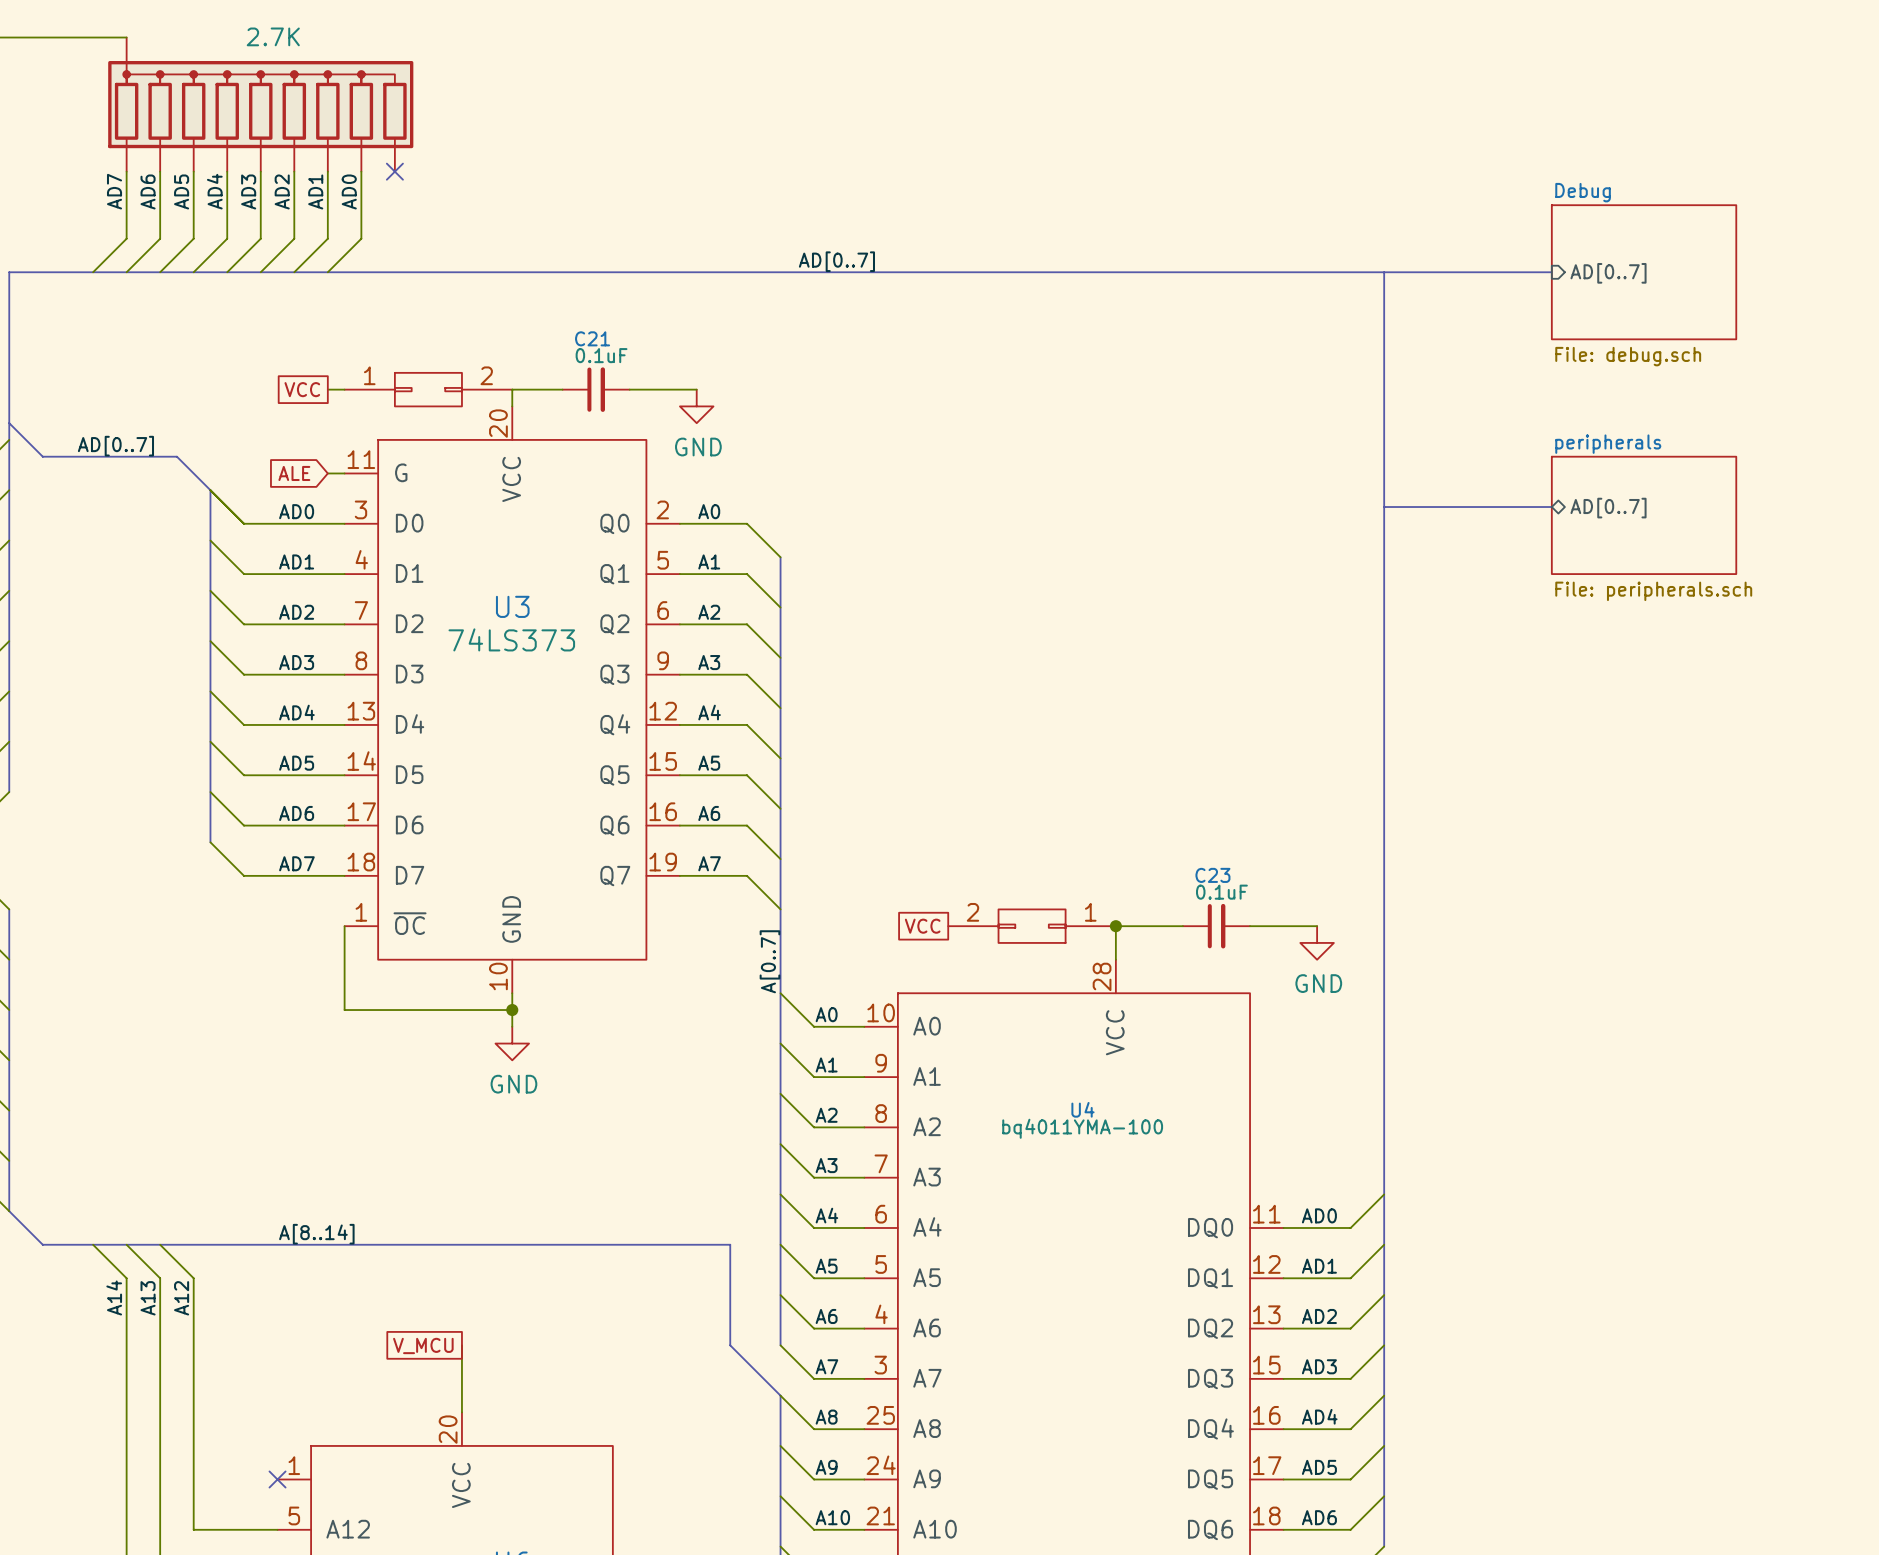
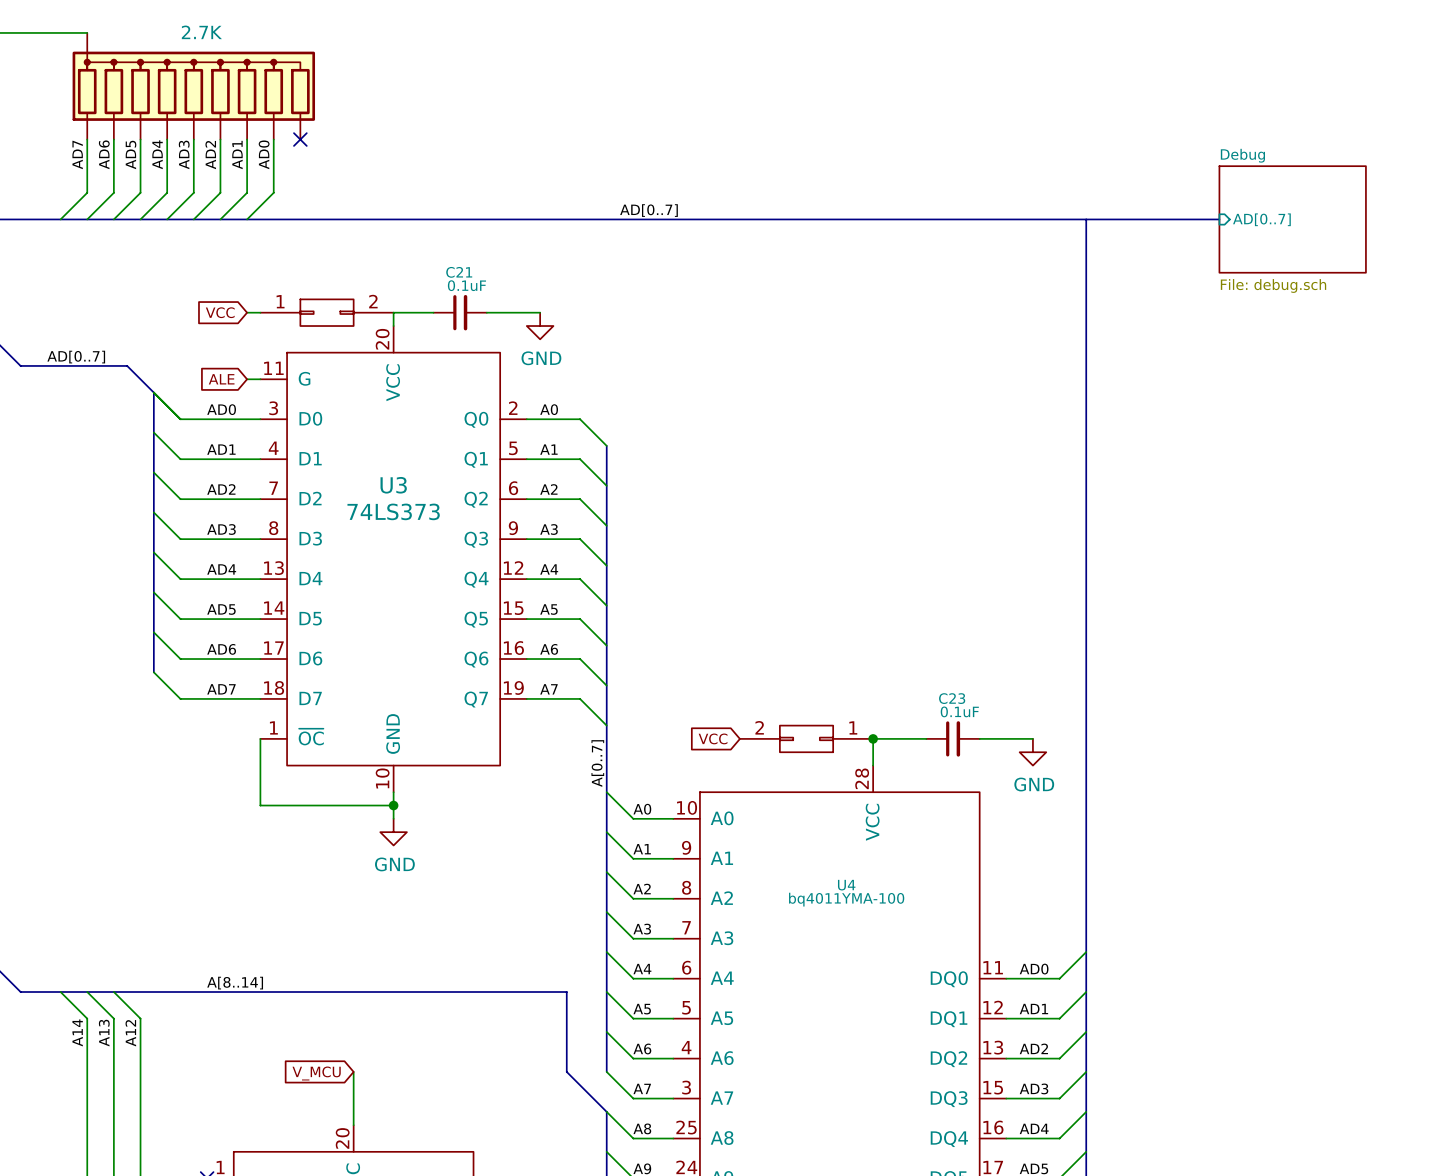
global label shape: passive (302, 389) -> input (220, 312)
bus: (1384, 507) (1551, 507) -> none
sheet pin: AD[0..7] (1608, 508) -> none
sheet peripherals: File: peripherals.sch (1644, 515) -> none
global label shape: passive (922, 926) -> input (713, 738)
global label shape: passive (423, 1345) -> input (316, 1073)

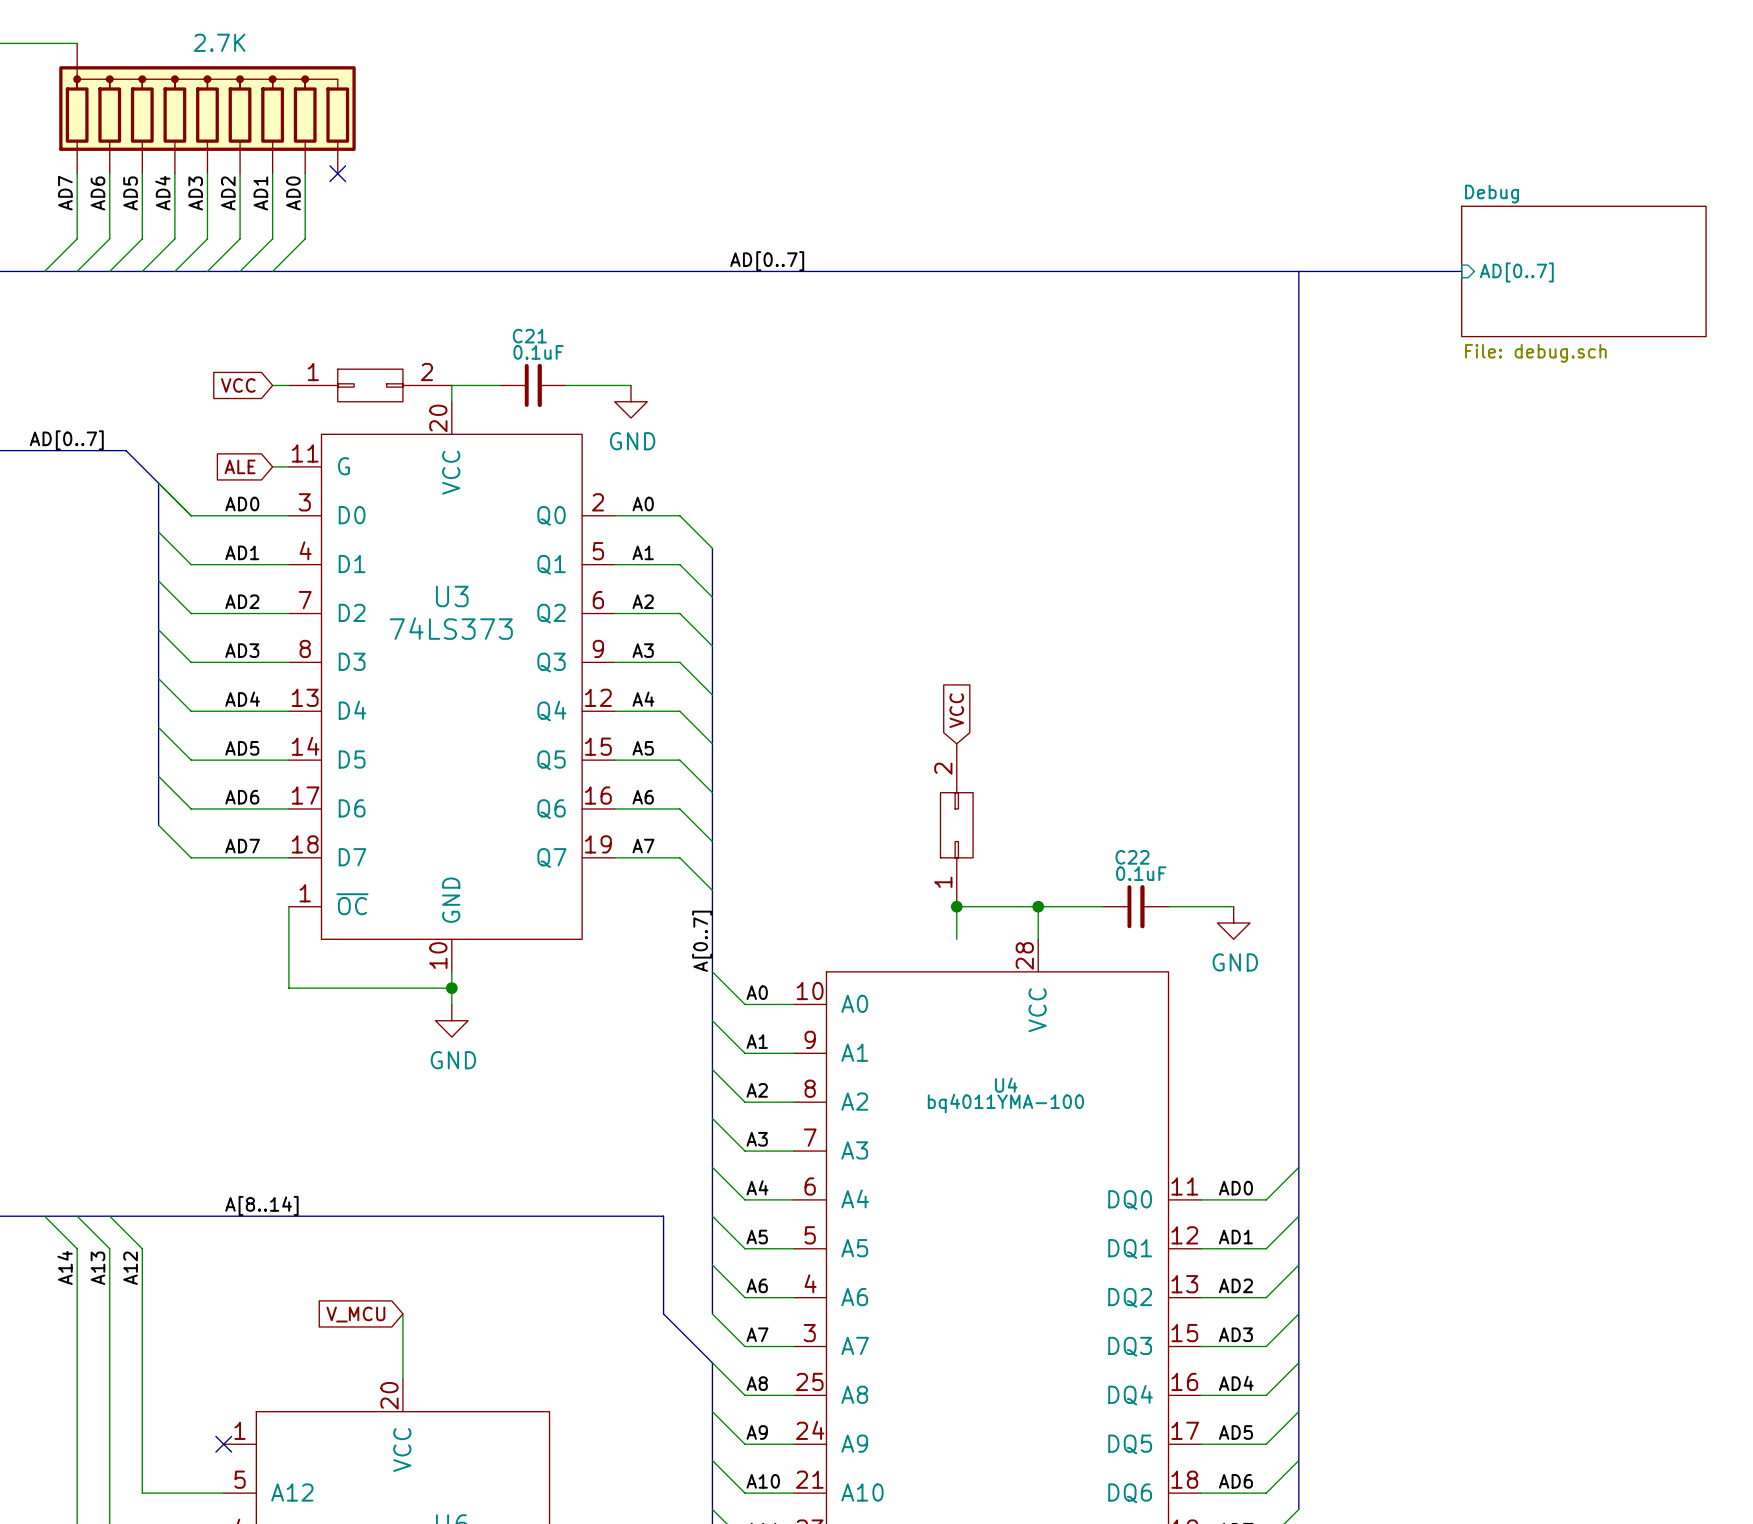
sheet Debug: File: debug.sch (1292, 219) -> none
sheet Debug: none -> File: debug.sch (1583, 271)
C23 name: C23 (952, 698) -> C22 (1132, 857)
global label rotation: 0° (713, 738) -> 90° clockwise (956, 710)
global label position: VCC (713, 738) -> VCC (956, 710)
part rotation: 0° (806, 738) -> 90° clockwise (956, 825)
junction: none -> (956, 906)
wire: none -> (1038, 906) (956, 906) (956, 939)

